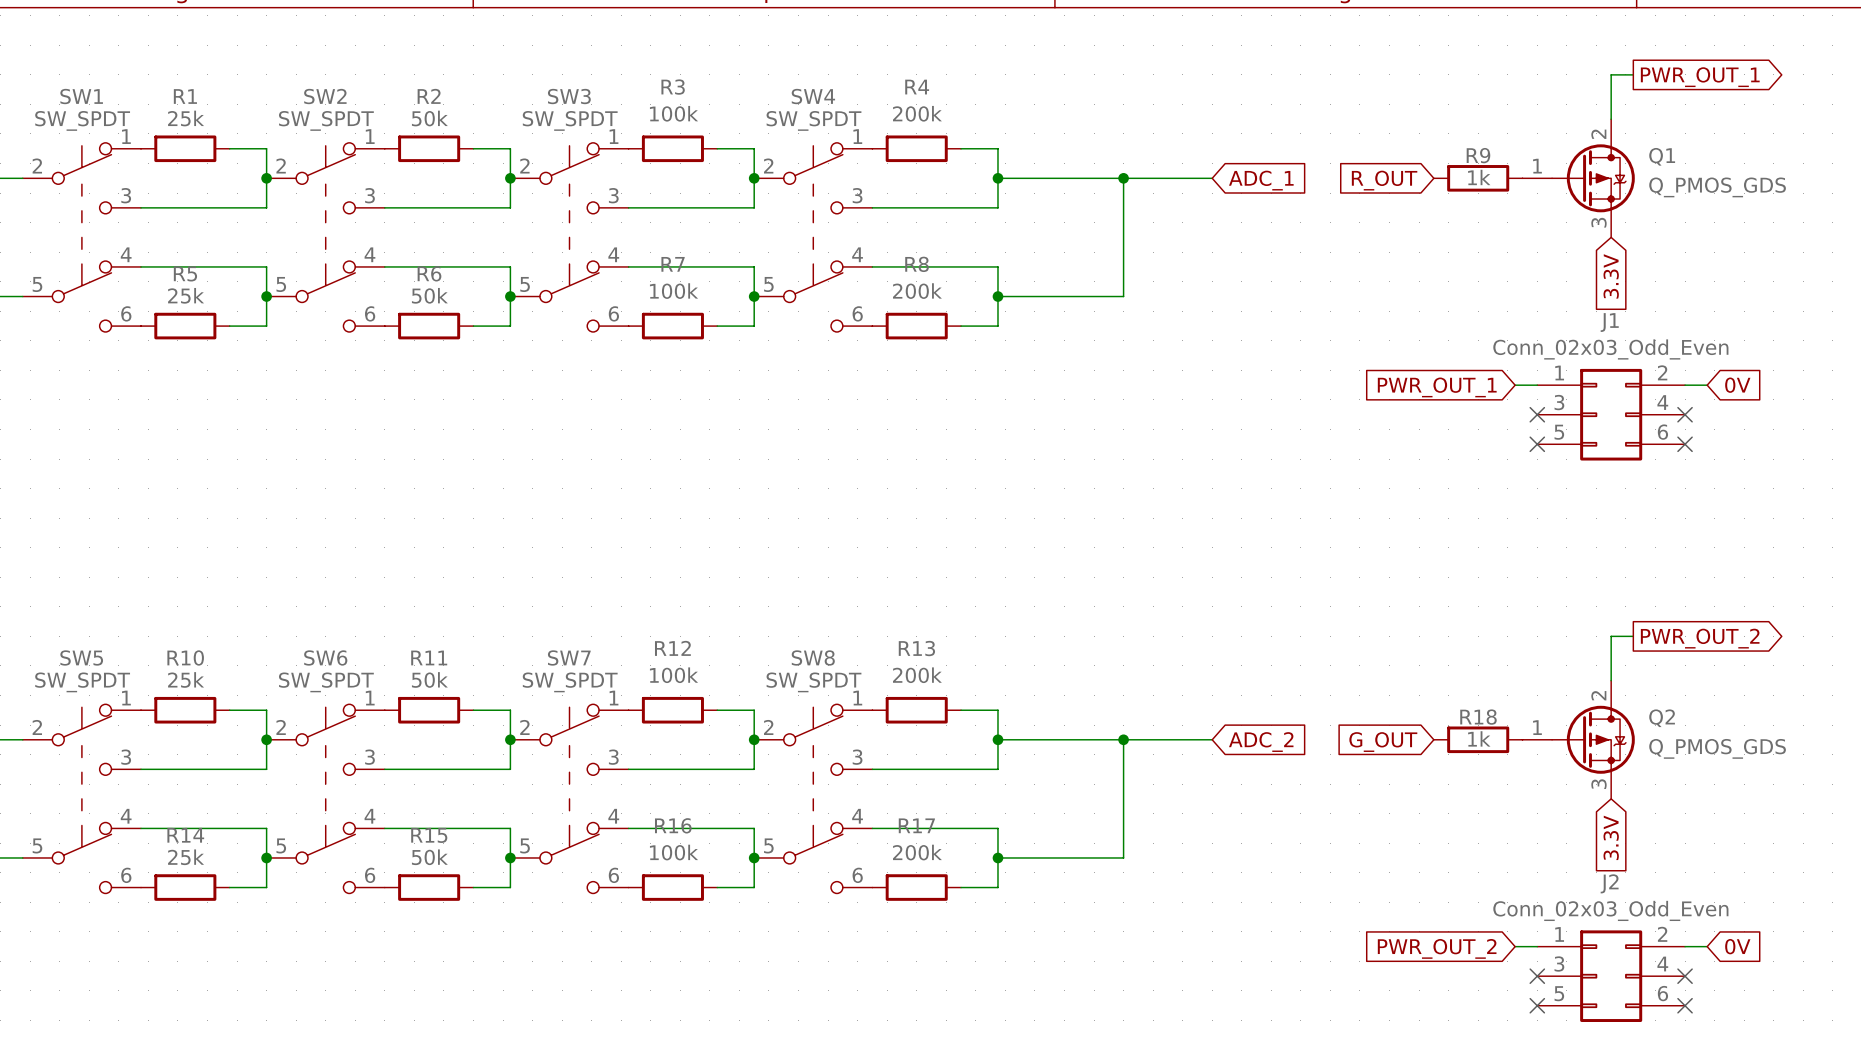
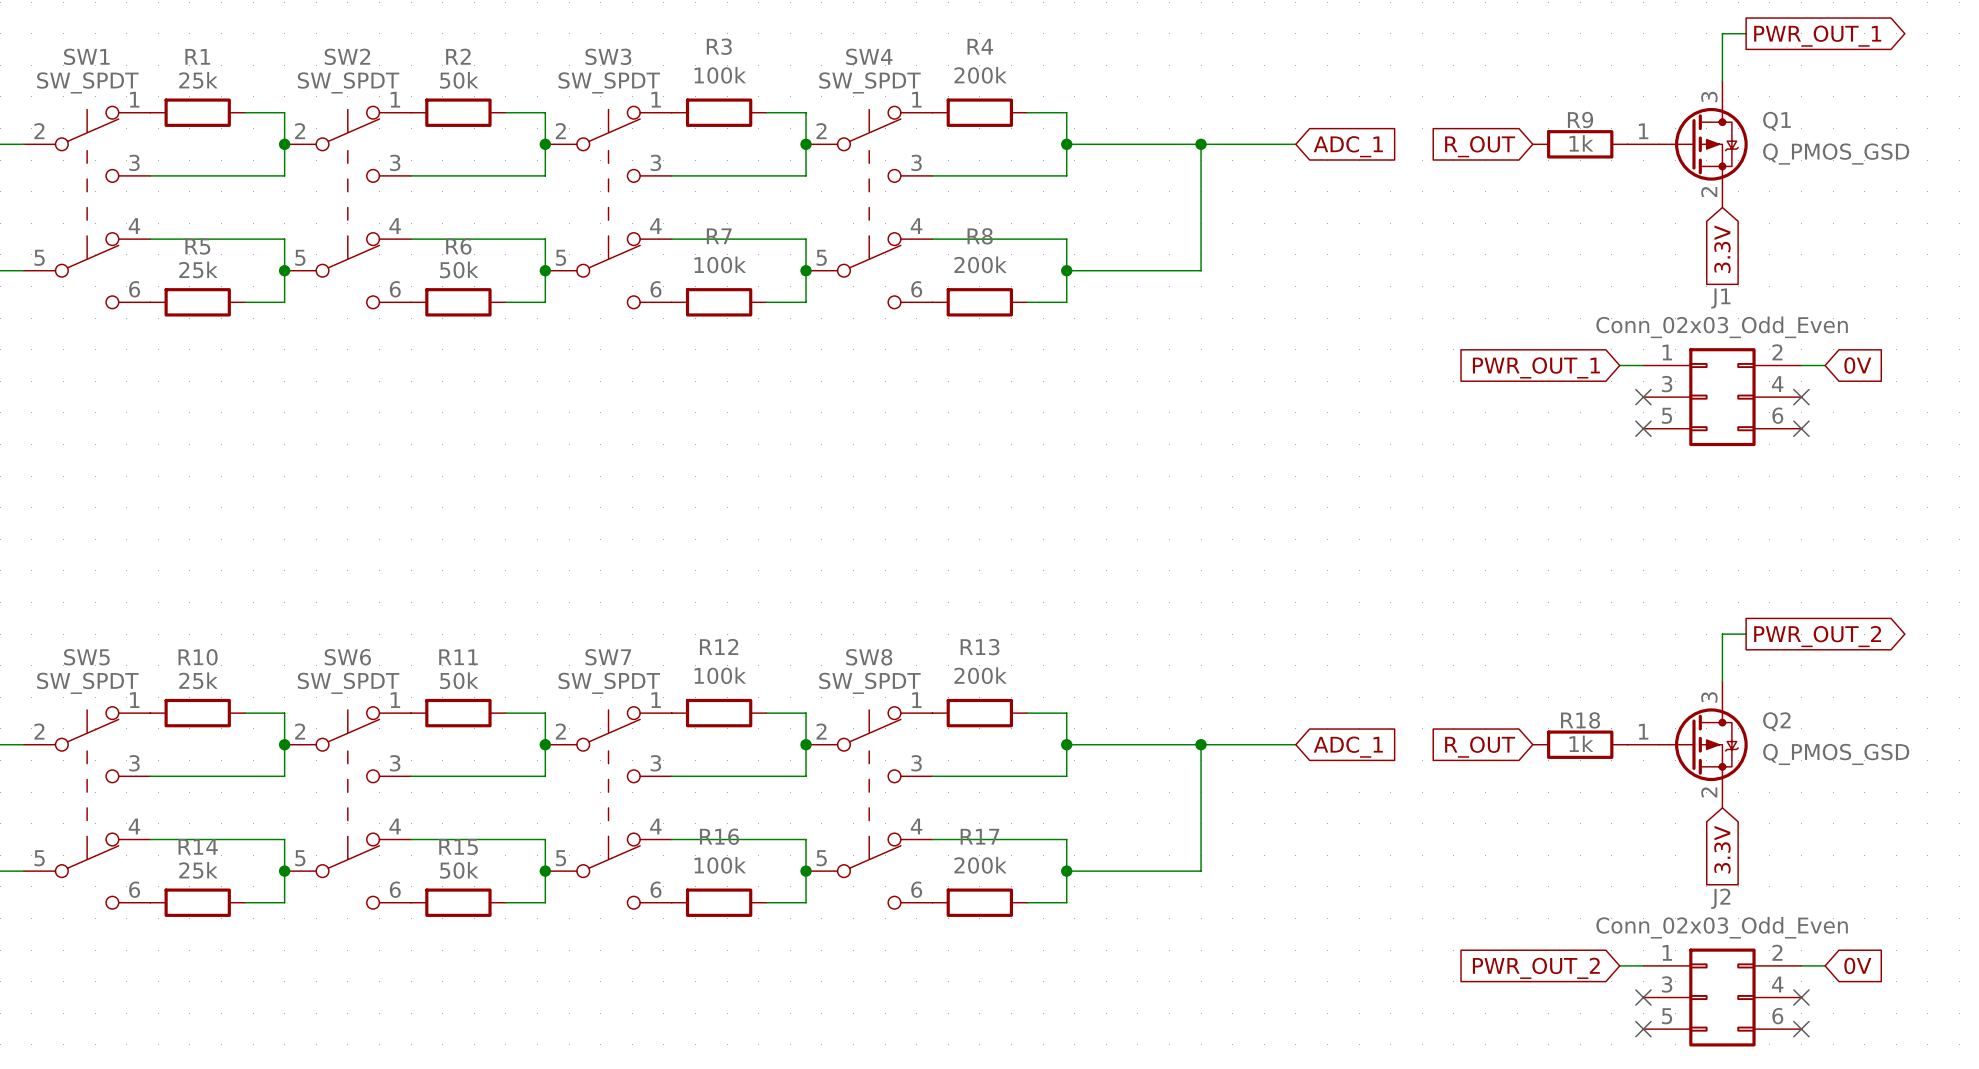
Q1 pin number: 2 (1598, 134) -> 3 (1709, 96)
Q1 value: Q_PMOS_GDS (1717, 187) -> Q_PMOS_GSD (1836, 154)
Q1 pin number: 3 (1598, 222) -> 2 (1709, 192)
Q2 pin number: 2 (1598, 695) -> 3 (1709, 697)
global label: ADC_2 (1261, 742) -> ADC_1 (1348, 747)
global label: G_OUT (1383, 742) -> R_OUT (1480, 747)
Q2 value: Q_PMOS_GDS (1717, 748) -> Q_PMOS_GSD (1836, 754)
Q2 pin number: 3 (1598, 784) -> 2 (1709, 792)

